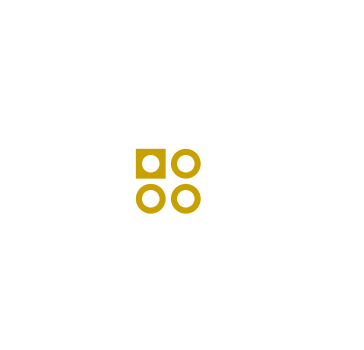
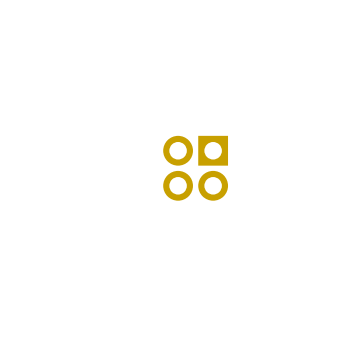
part rotation: 0° (168, 181) -> 90° clockwise (195, 168)

